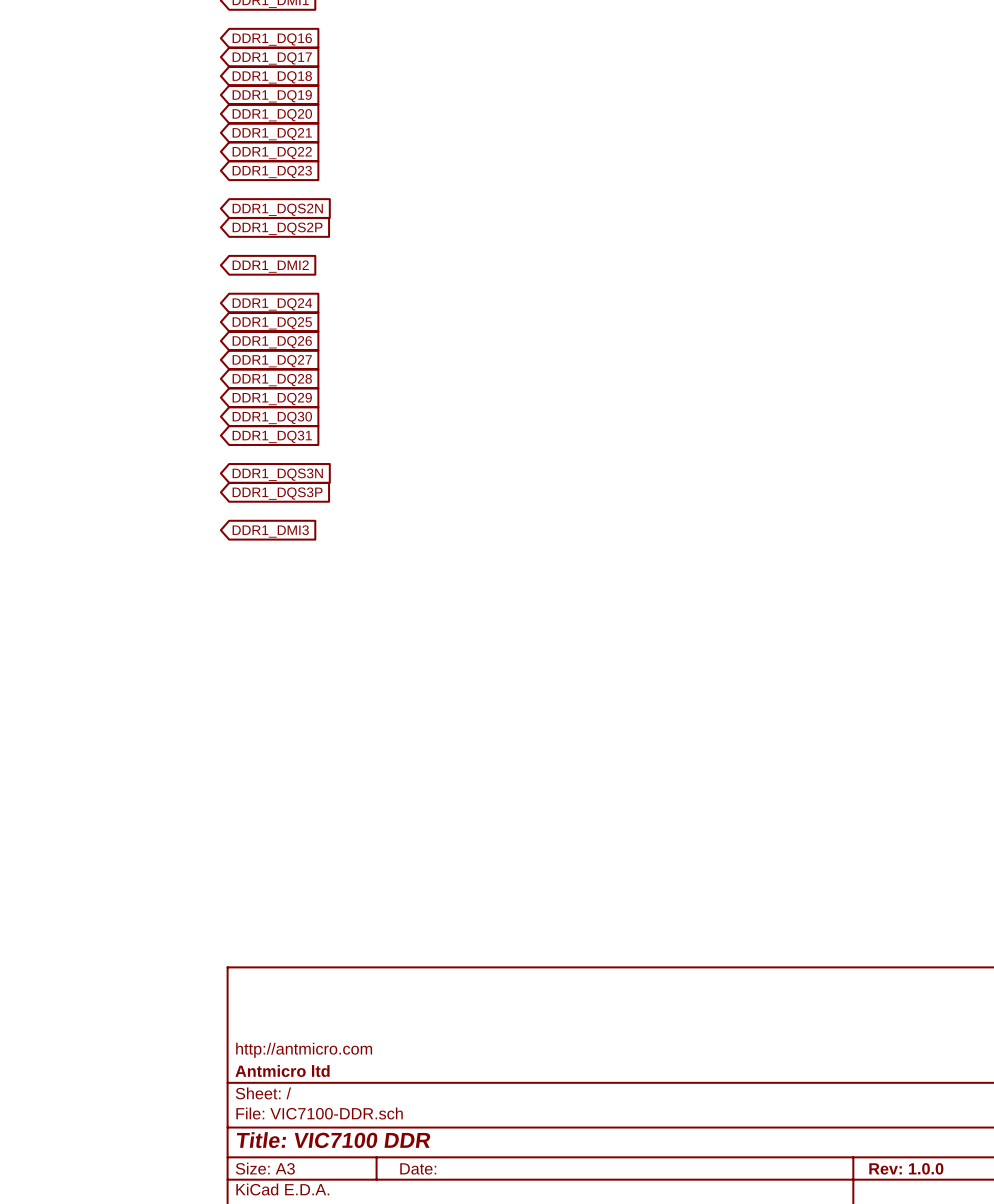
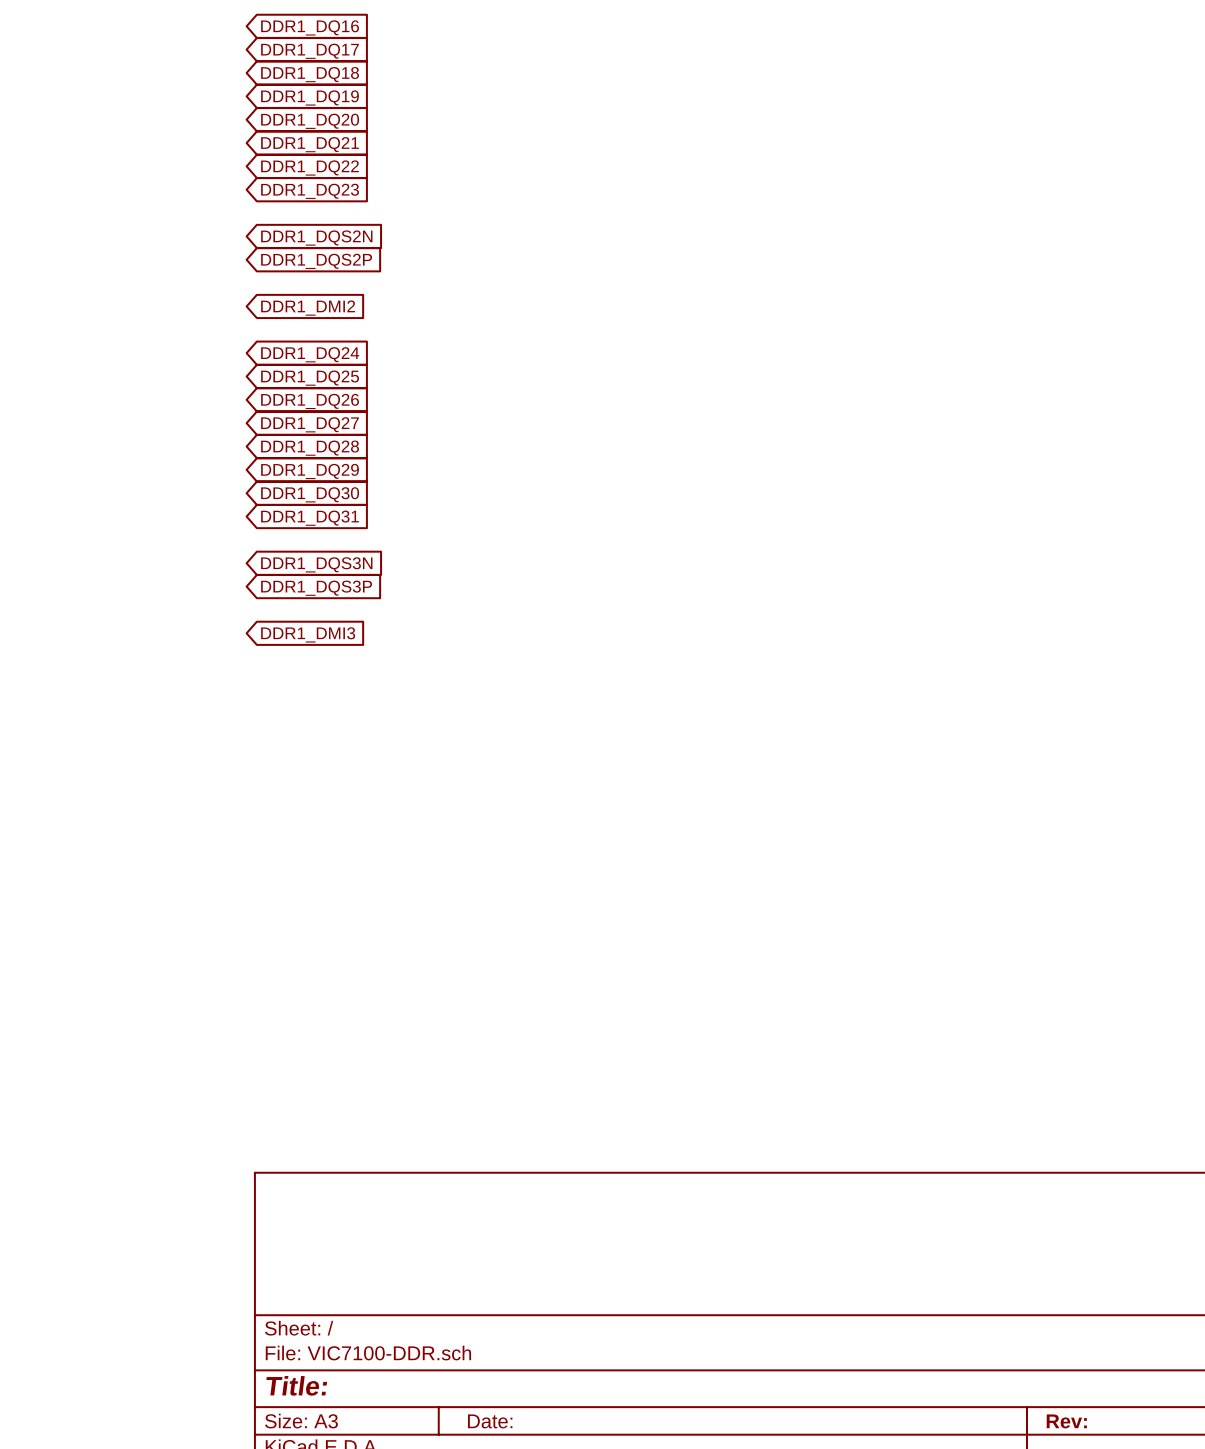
title block: http://antmicro.com (304, 1050) -> none
title block: Antmicro ltd (282, 1071) -> none
title block: Title: VIC7100 DDR (333, 1140) -> Title: (296, 1385)
title block: Rev: 1.0.0 (906, 1168) -> Rev: (1066, 1421)

